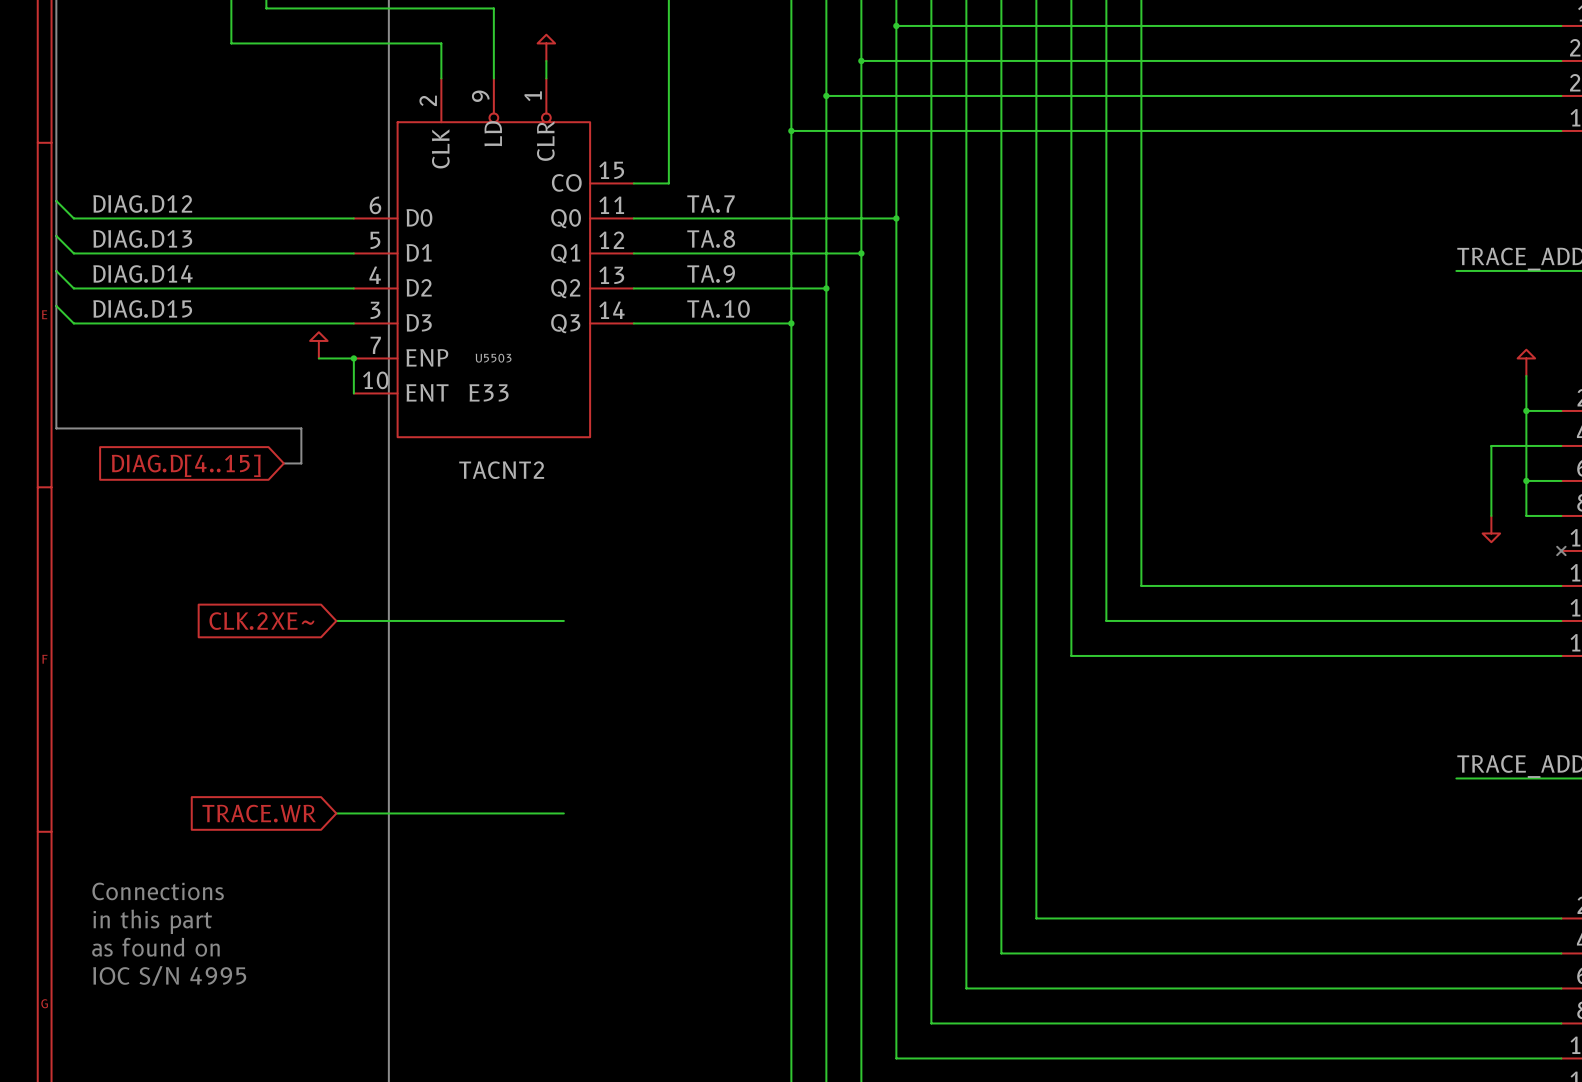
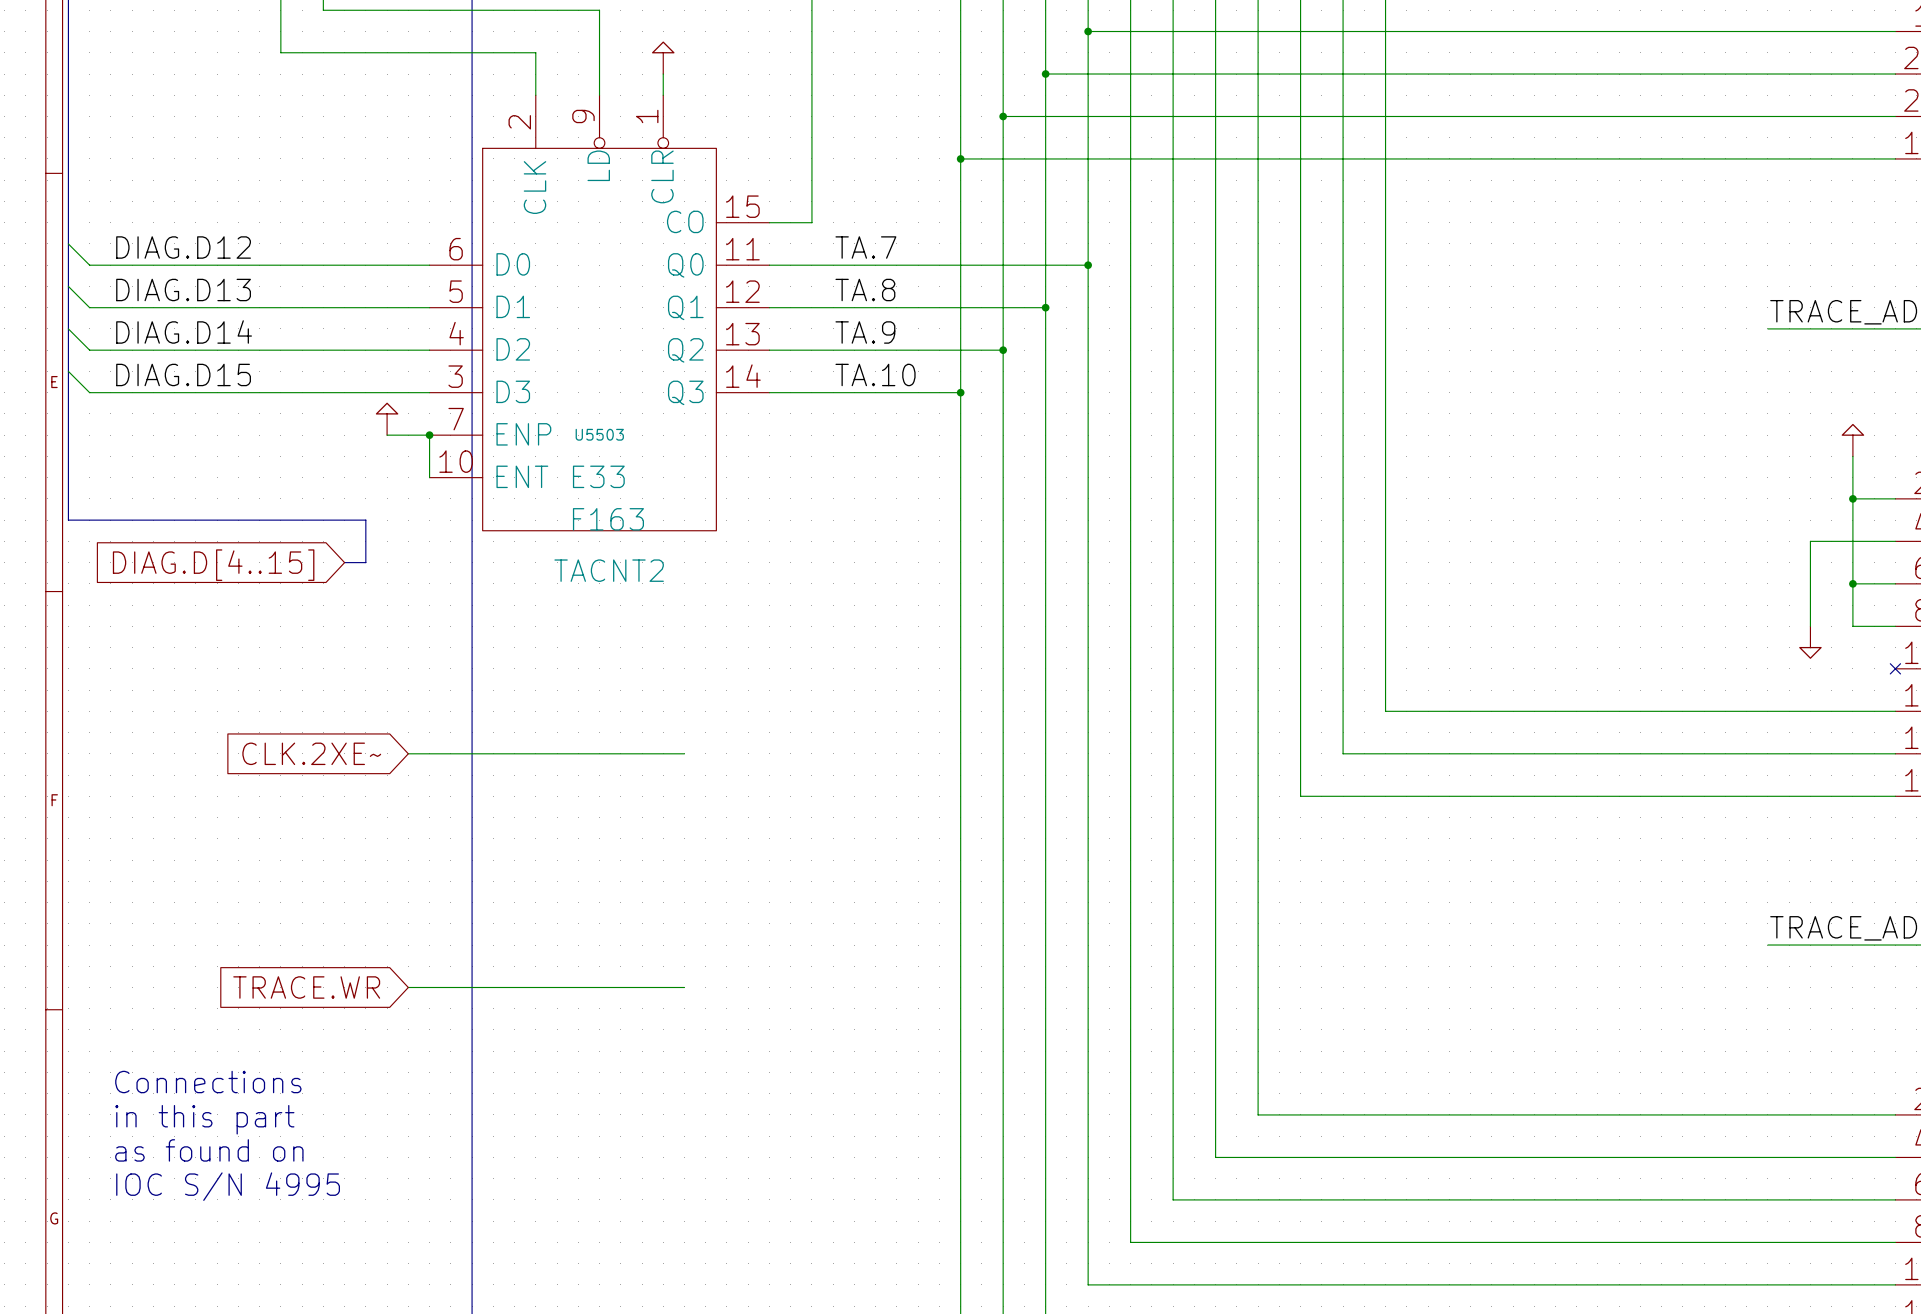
U5503 value: none -> F163 (608, 519)

